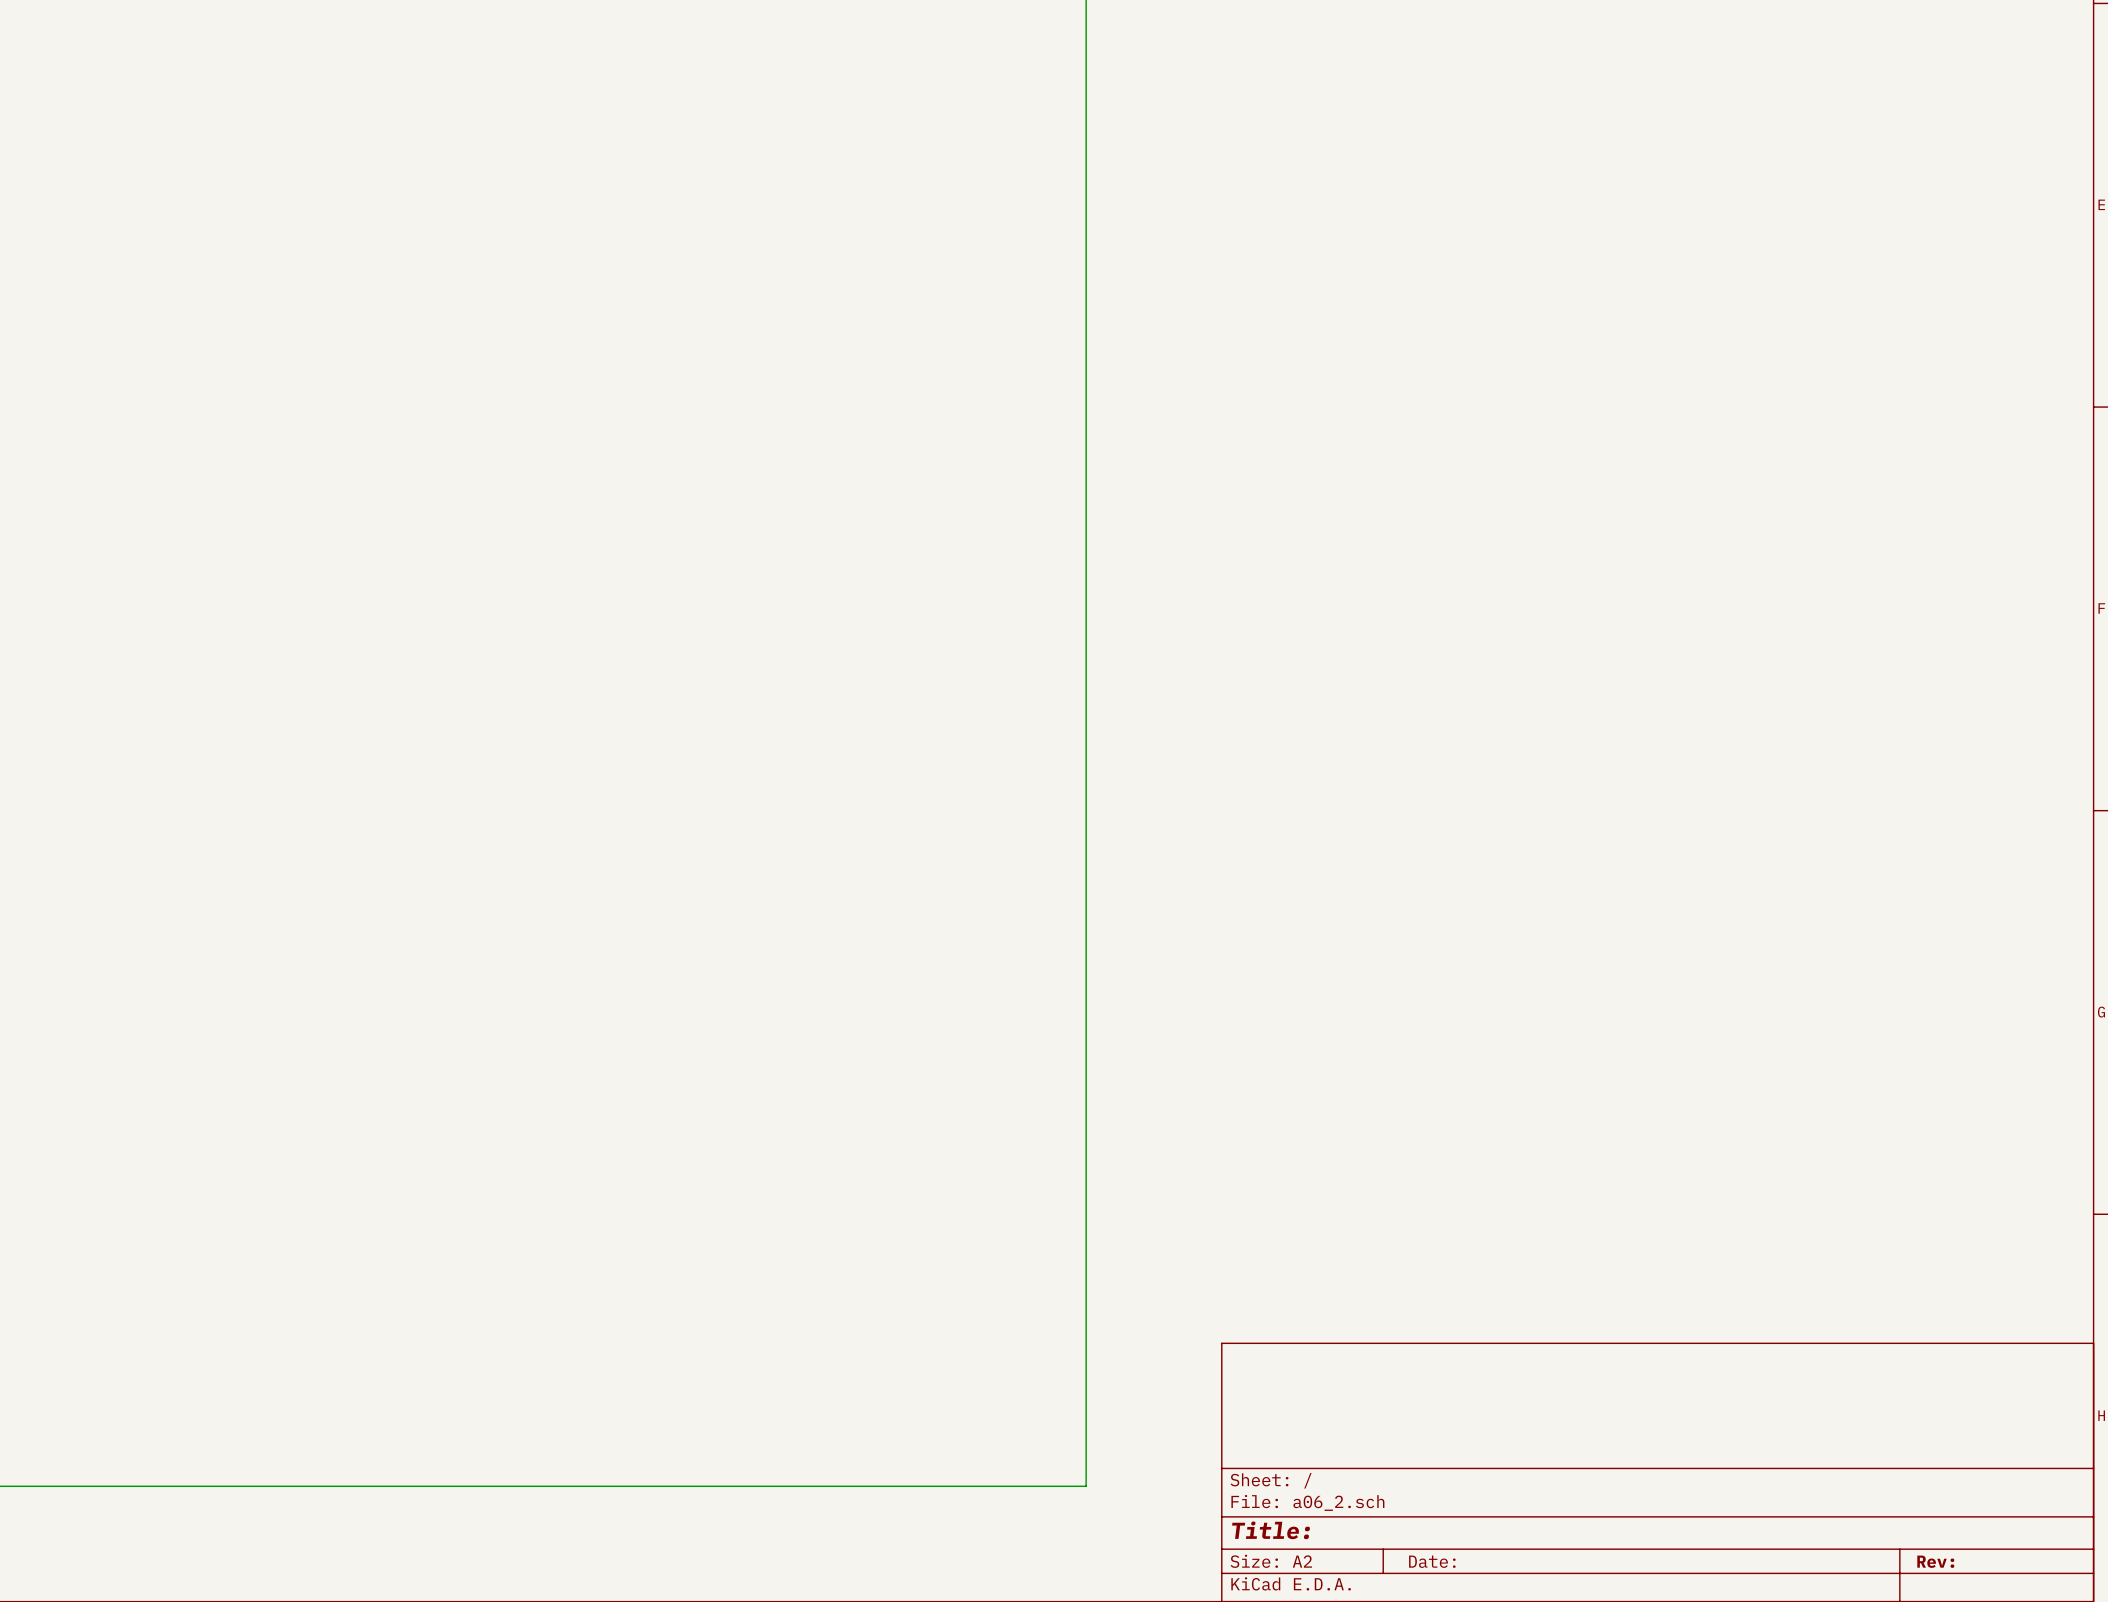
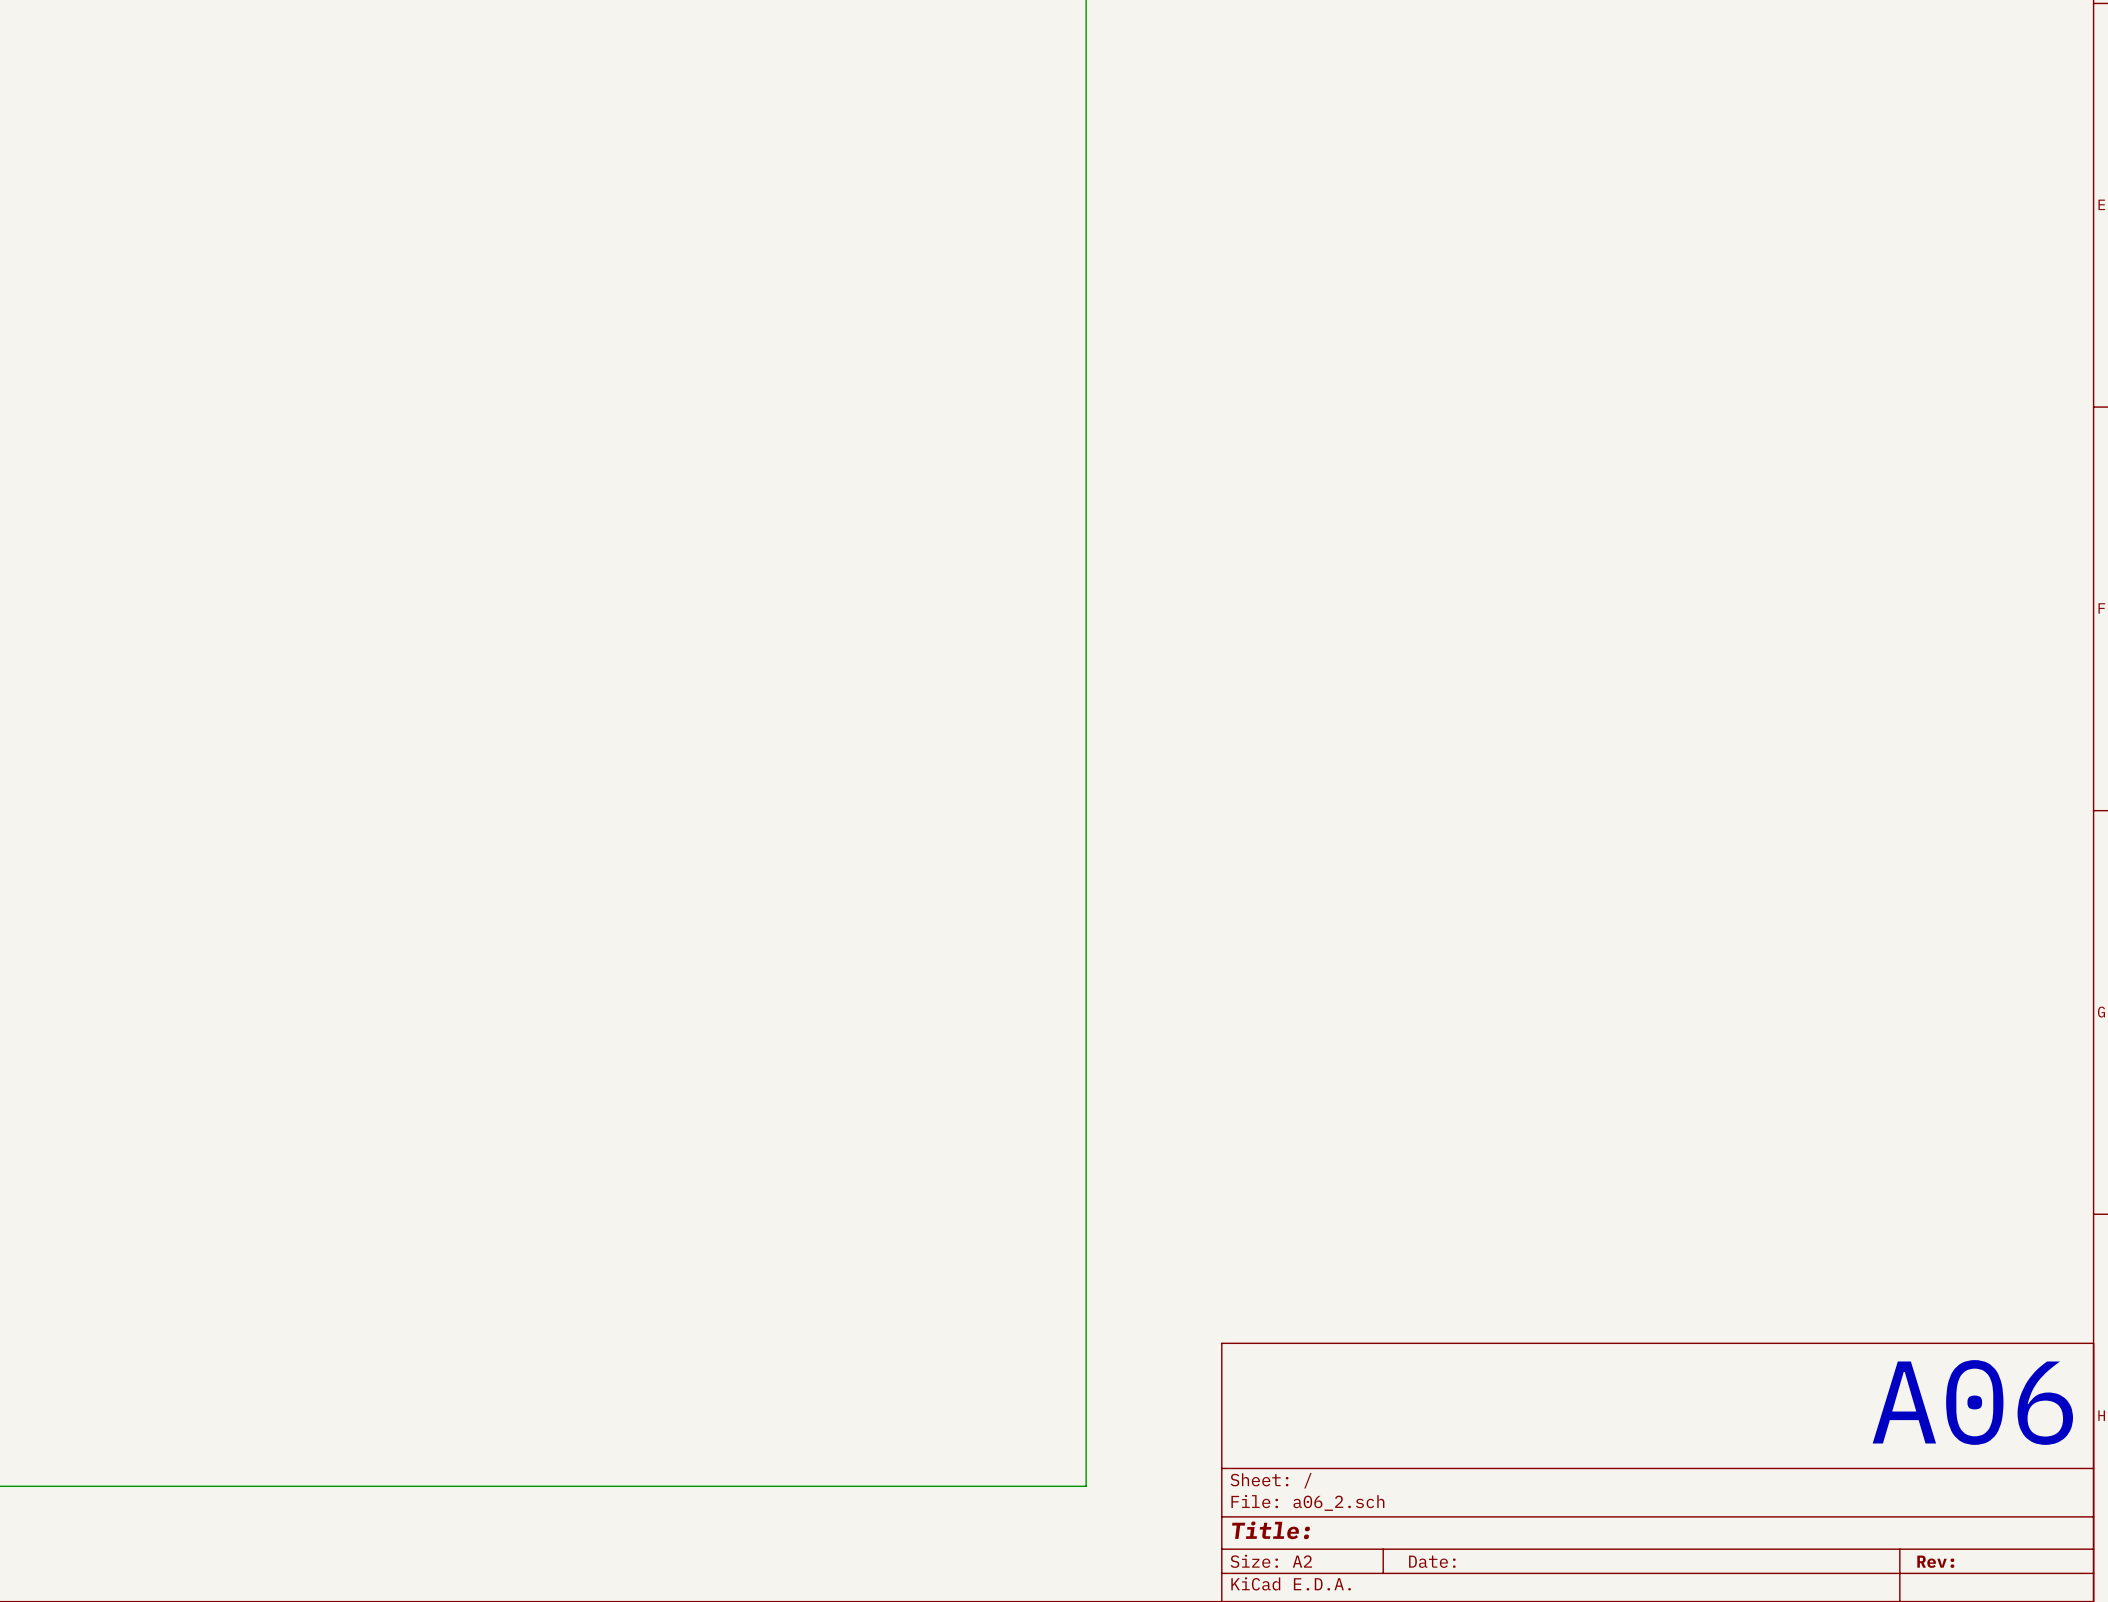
text: none -> A06 (1972, 1402)

